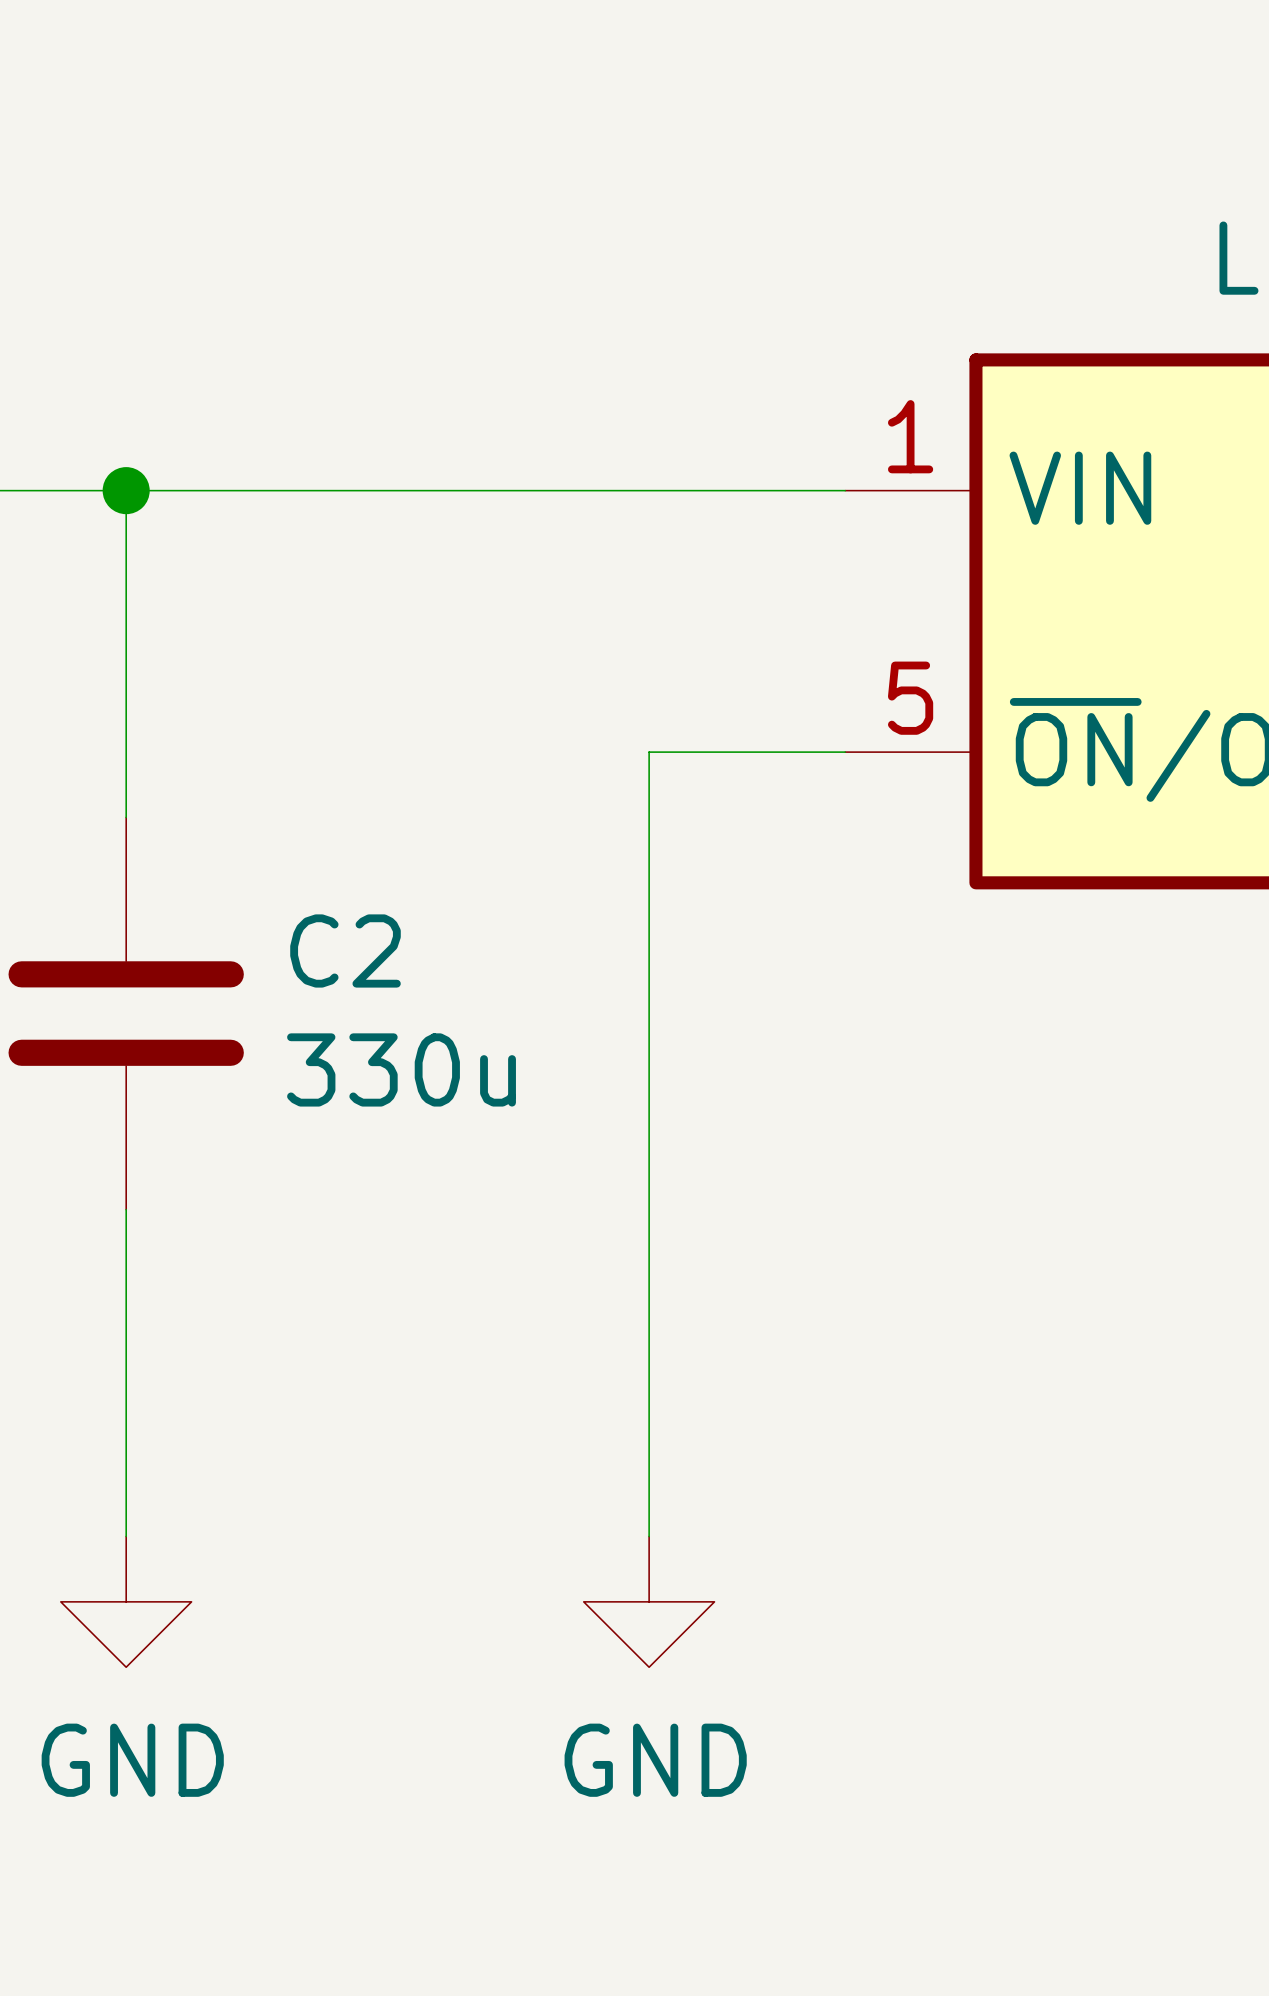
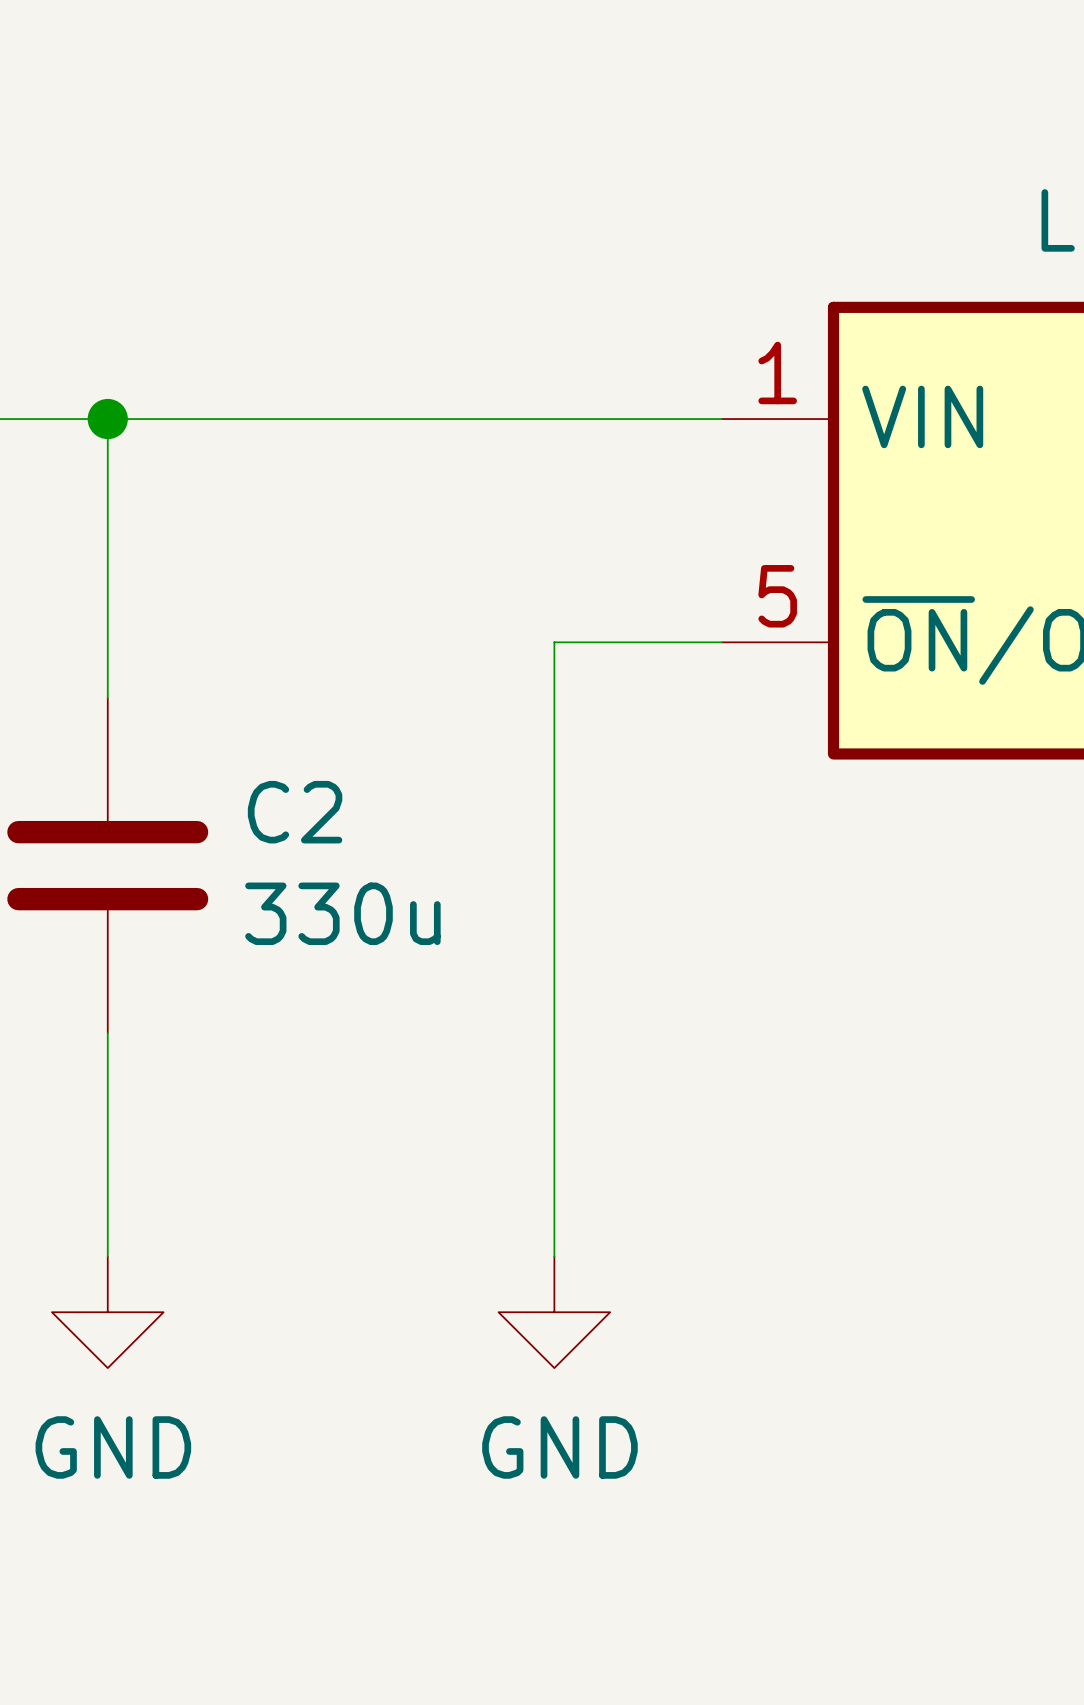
power symbol position: GND (126, 1601) -> GND (107, 1312)
power symbol position: GND (649, 1601) -> GND (554, 1312)

